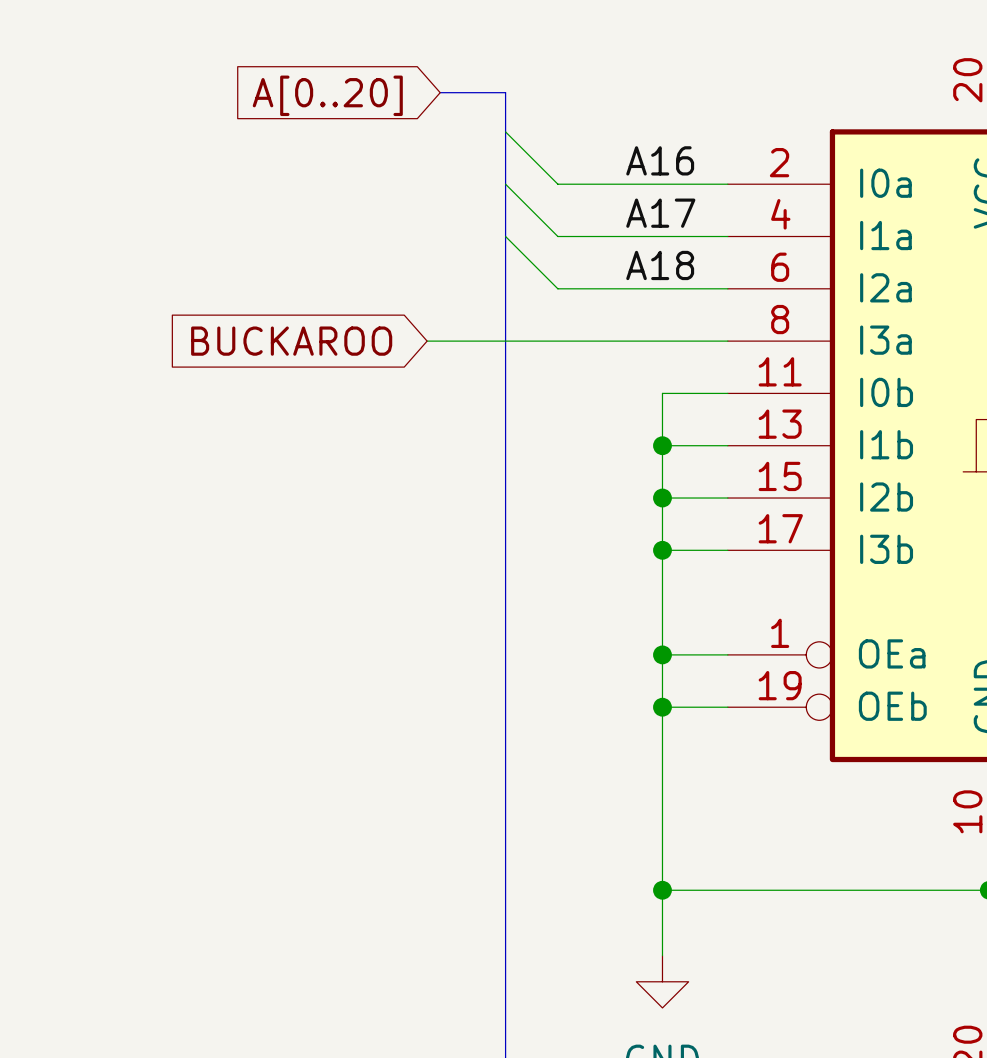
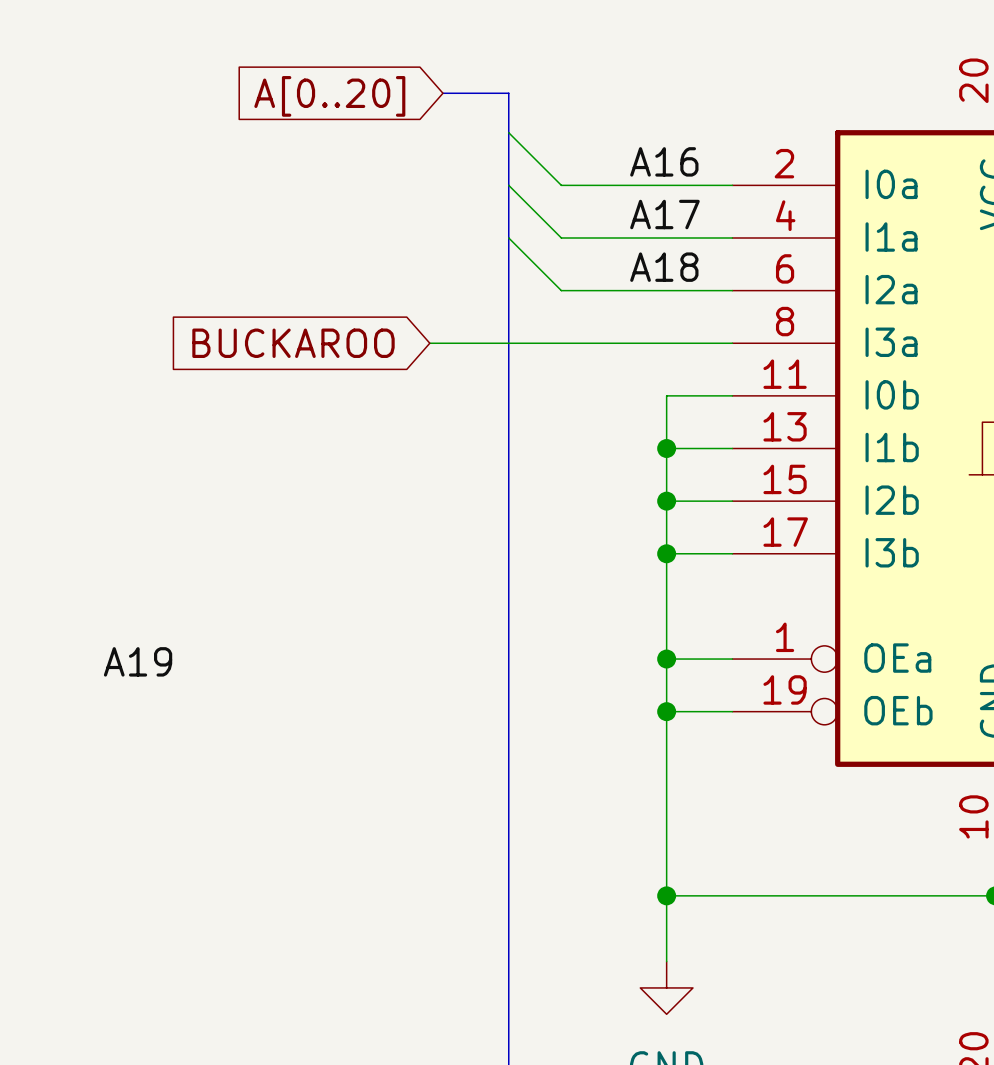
label: none -> A19 (138, 661)

